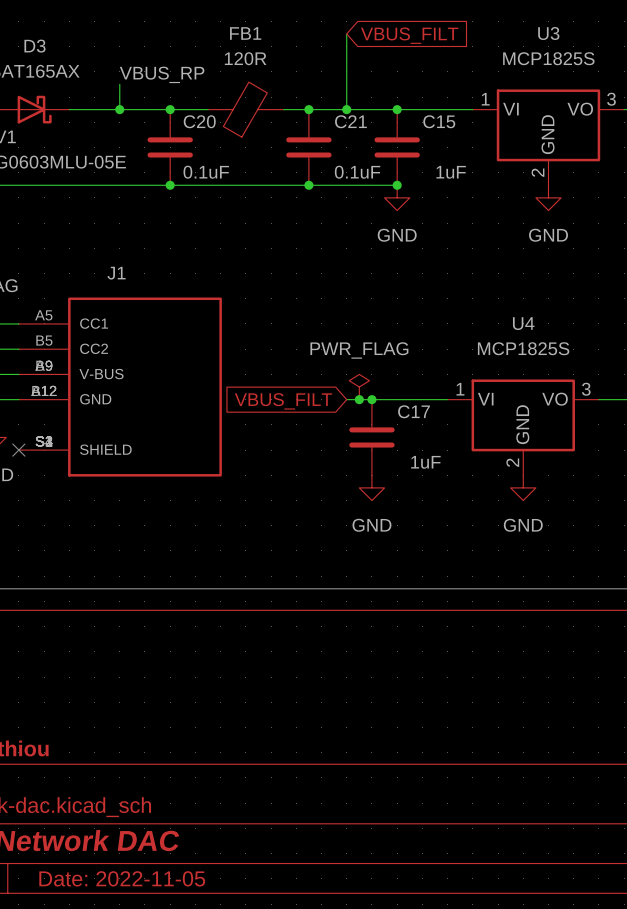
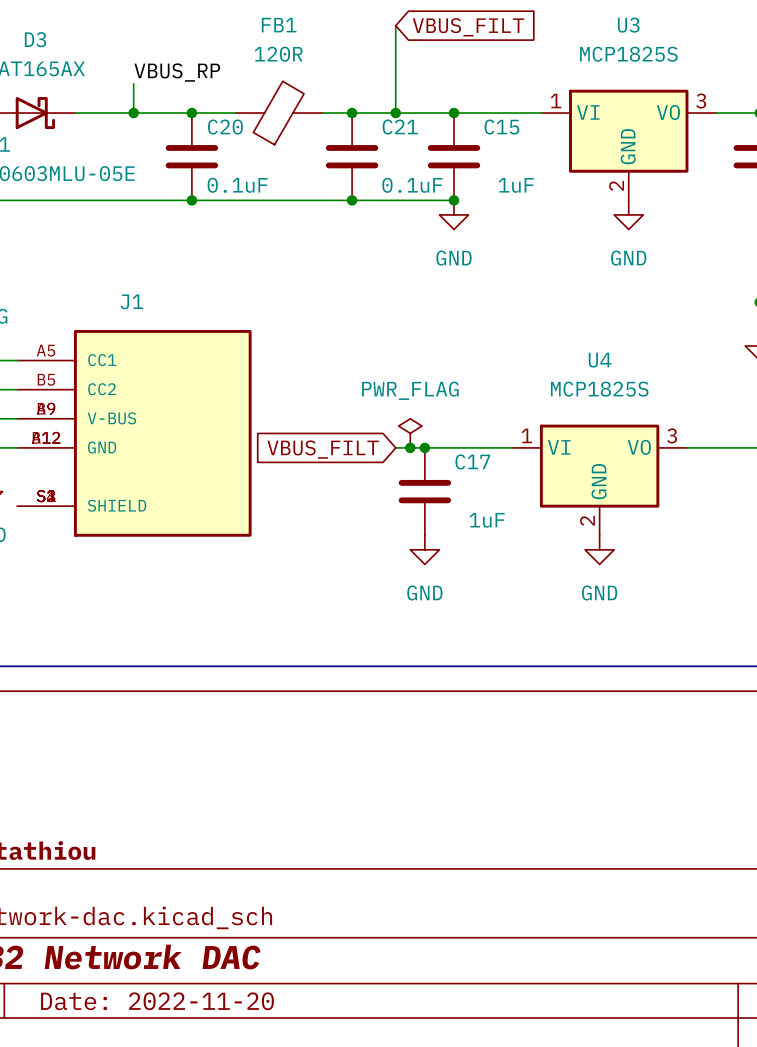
no-connect mark: (18, 450) -> none
title block: Date: 2022-11-05 (122, 878) -> Date: 2022-11-20 (157, 1001)

